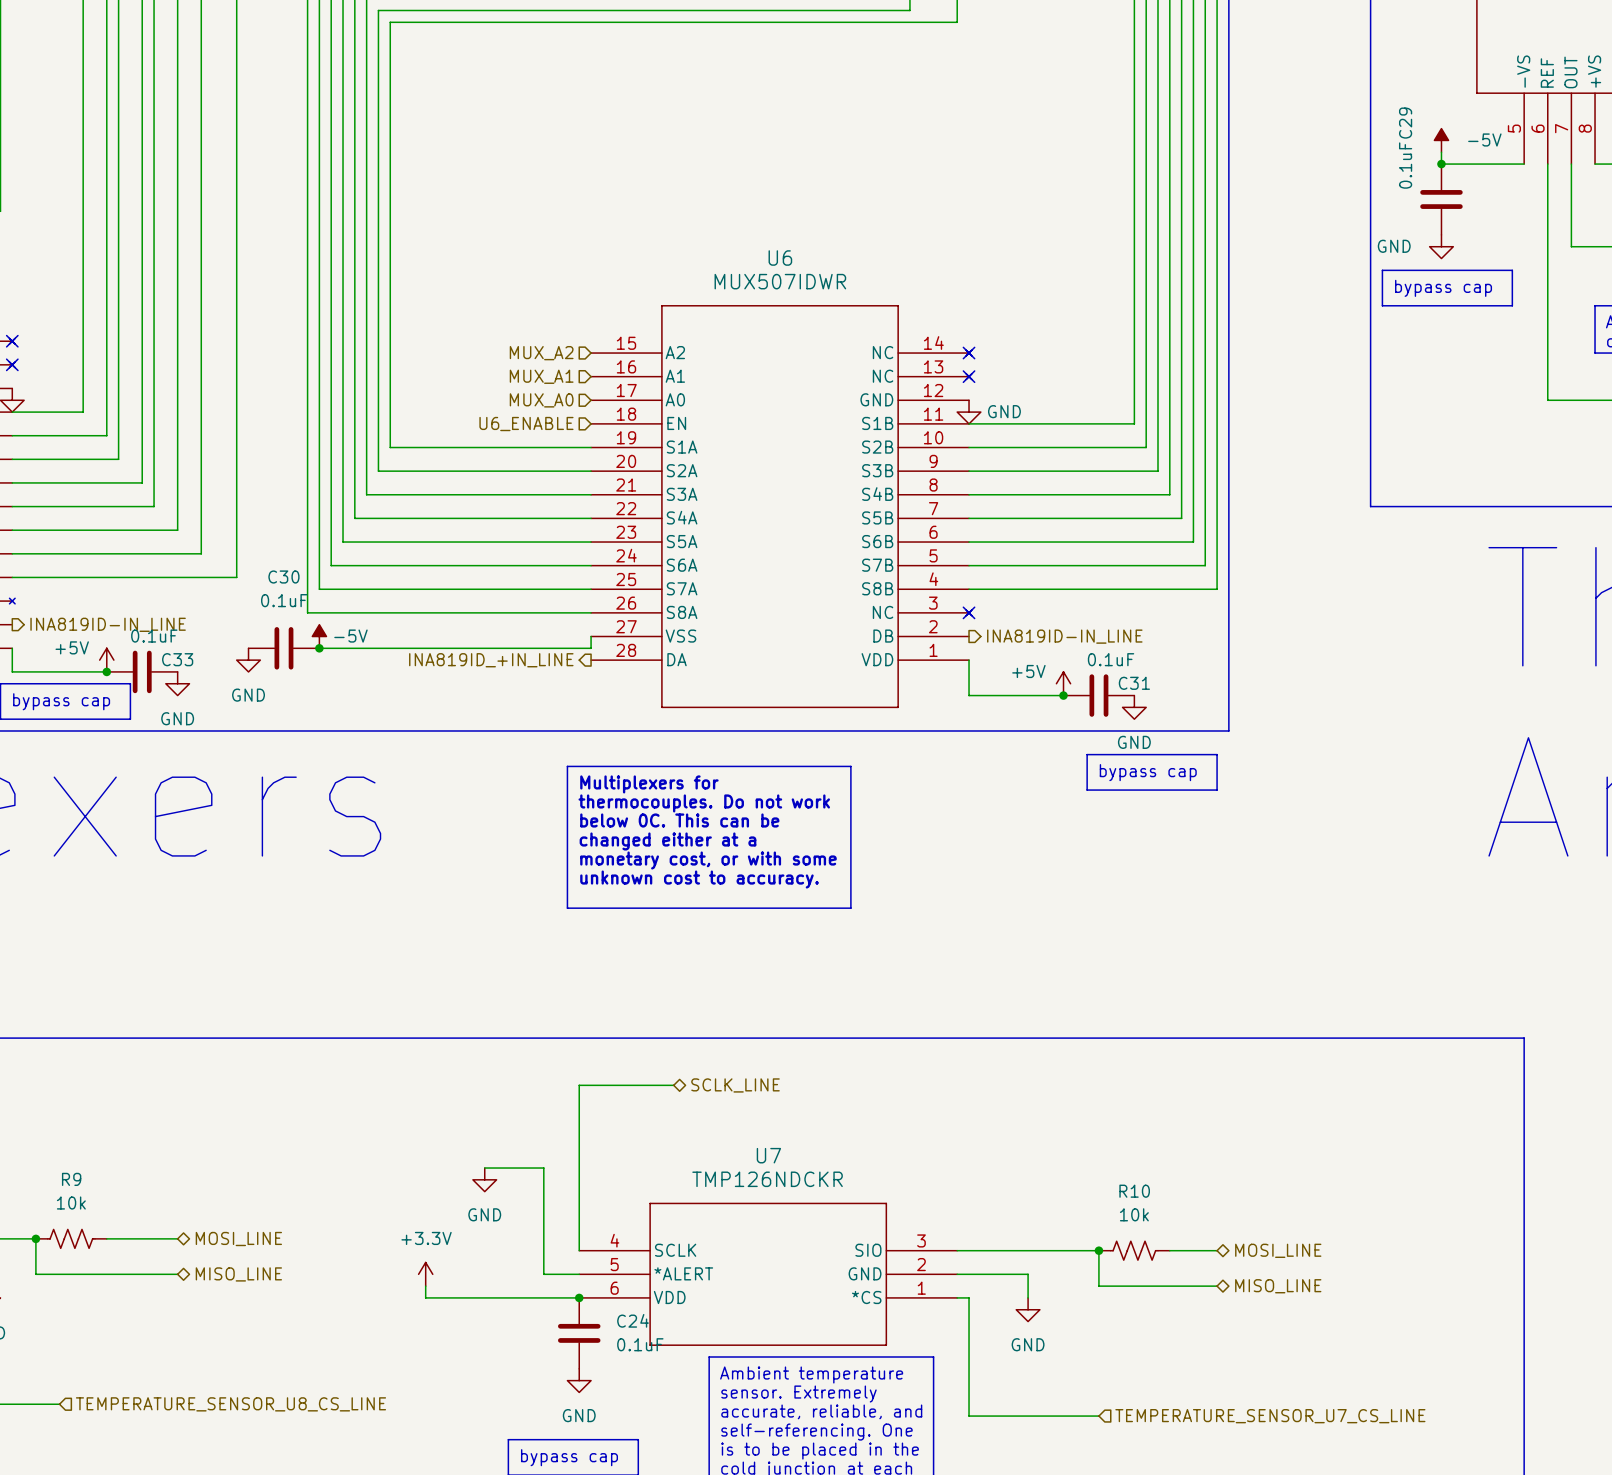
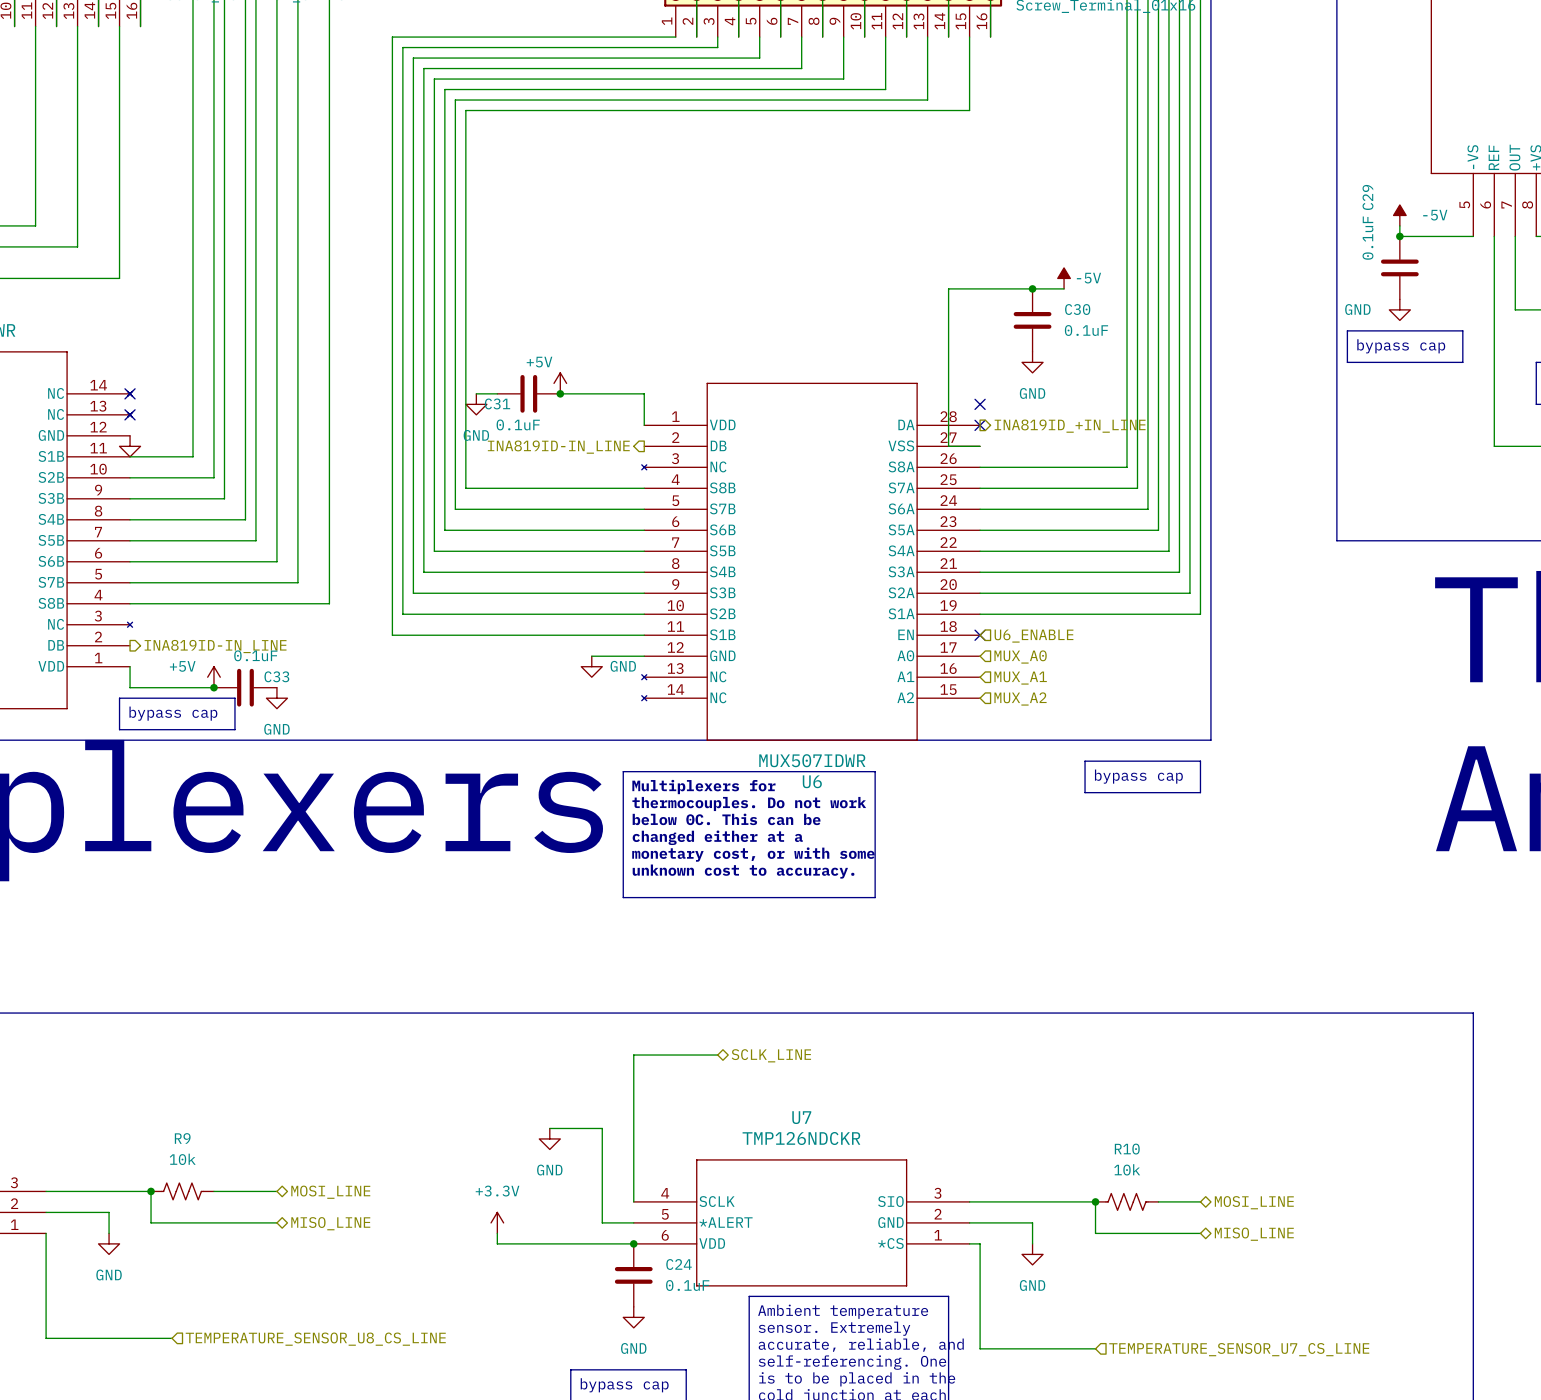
power symbol: none -> -5V (1064, 278)
junction: none -> (1032, 288)
wire: none -> (1064, 288) (948, 288) (948, 446) (980, 446)
power symbol: none -> +5V (560, 383)
wire: none -> (476, 393) (497, 393)
wire: none -> (560, 393) (644, 393) (644, 425)
junction: none -> (560, 393)
power symbol: none -> GND (476, 404)
hierarchical label: MUX_A2 (541, 353) -> none
hierarchical label: MUX_A1 (541, 376) -> none
hierarchical label: none -> INA819ID_+IN_LINE (1070, 426)
hierarchical label shape: input (541, 400) -> output (558, 447)
hierarchical label: MUX_A0 (541, 400) -> INA819ID-IN_LINE (558, 447)
power symbol text position: GND (1004, 411) -> GND (1032, 393)
power symbol position: GND (969, 412) -> GND (1032, 362)
hierarchical label: U6_ENABLE (526, 424) -> none
U6 rotation: 0° (816, 506) -> 180° (779, 561)
C30 name position: C30 (283, 577) -> C30 (1077, 309)
C30 value position: 0.1uF (284, 600) -> 0.1uF (1086, 330)
hierarchical label: none -> U6_ENABLE (1034, 636)
power symbol: -5V (319, 636) -> none
wire: (591, 636) (591, 648) (319, 648) -> (644, 656) (591, 656)
hierarchical label shape: output (1064, 636) -> input (1020, 657)
hierarchical label: INA819ID-IN_LINE (1064, 636) -> MUX_A0 (1020, 657)
C30 rotation: 0° (283, 648) -> 90° clockwise (1032, 320)
C30 position: (283, 648) -> (1032, 320)
junction: (319, 648) -> none
power symbol: none -> GND (591, 666)
C31 value position: 0.1uF (1111, 659) -> 0.1uF (518, 424)
power symbol: GND (248, 660) -> none
hierarchical label: INA819ID_+IN_LINE (491, 660) -> none
wire: (969, 660) (969, 695) (1063, 695) -> none
hierarchical label: none -> MUX_A1 (1020, 678)
hierarchical label: none -> MUX_A2 (1020, 698)
power symbol: +5V (1063, 683) -> none
C31 name position: C31 (1134, 683) -> C31 (497, 403)
junction: (1063, 695) -> none
C31 position: (1098, 695) -> (528, 393)
power symbol: GND (1134, 707) -> none

